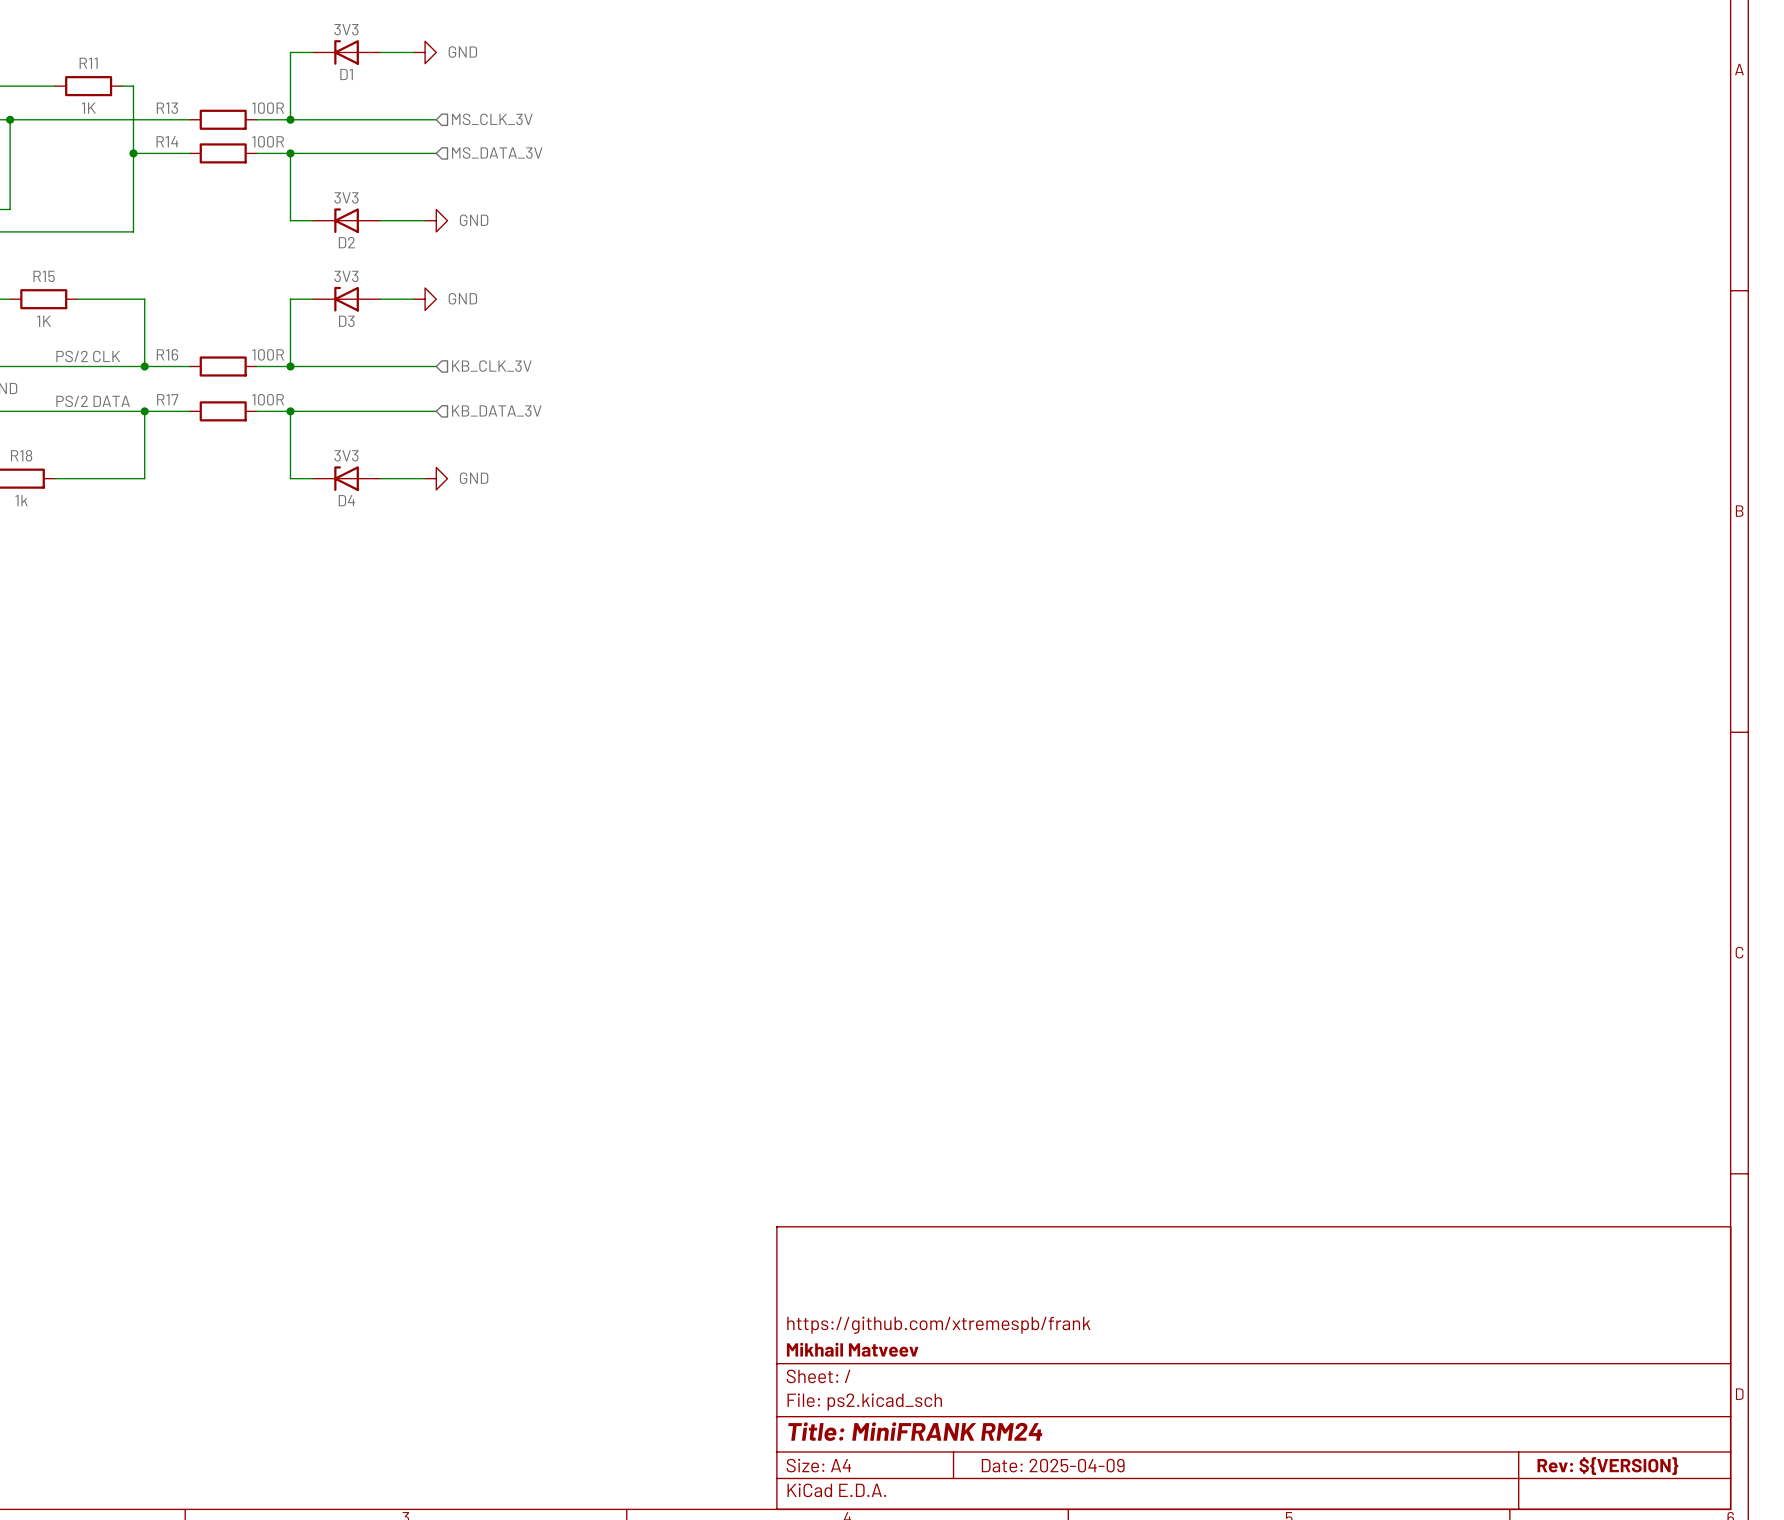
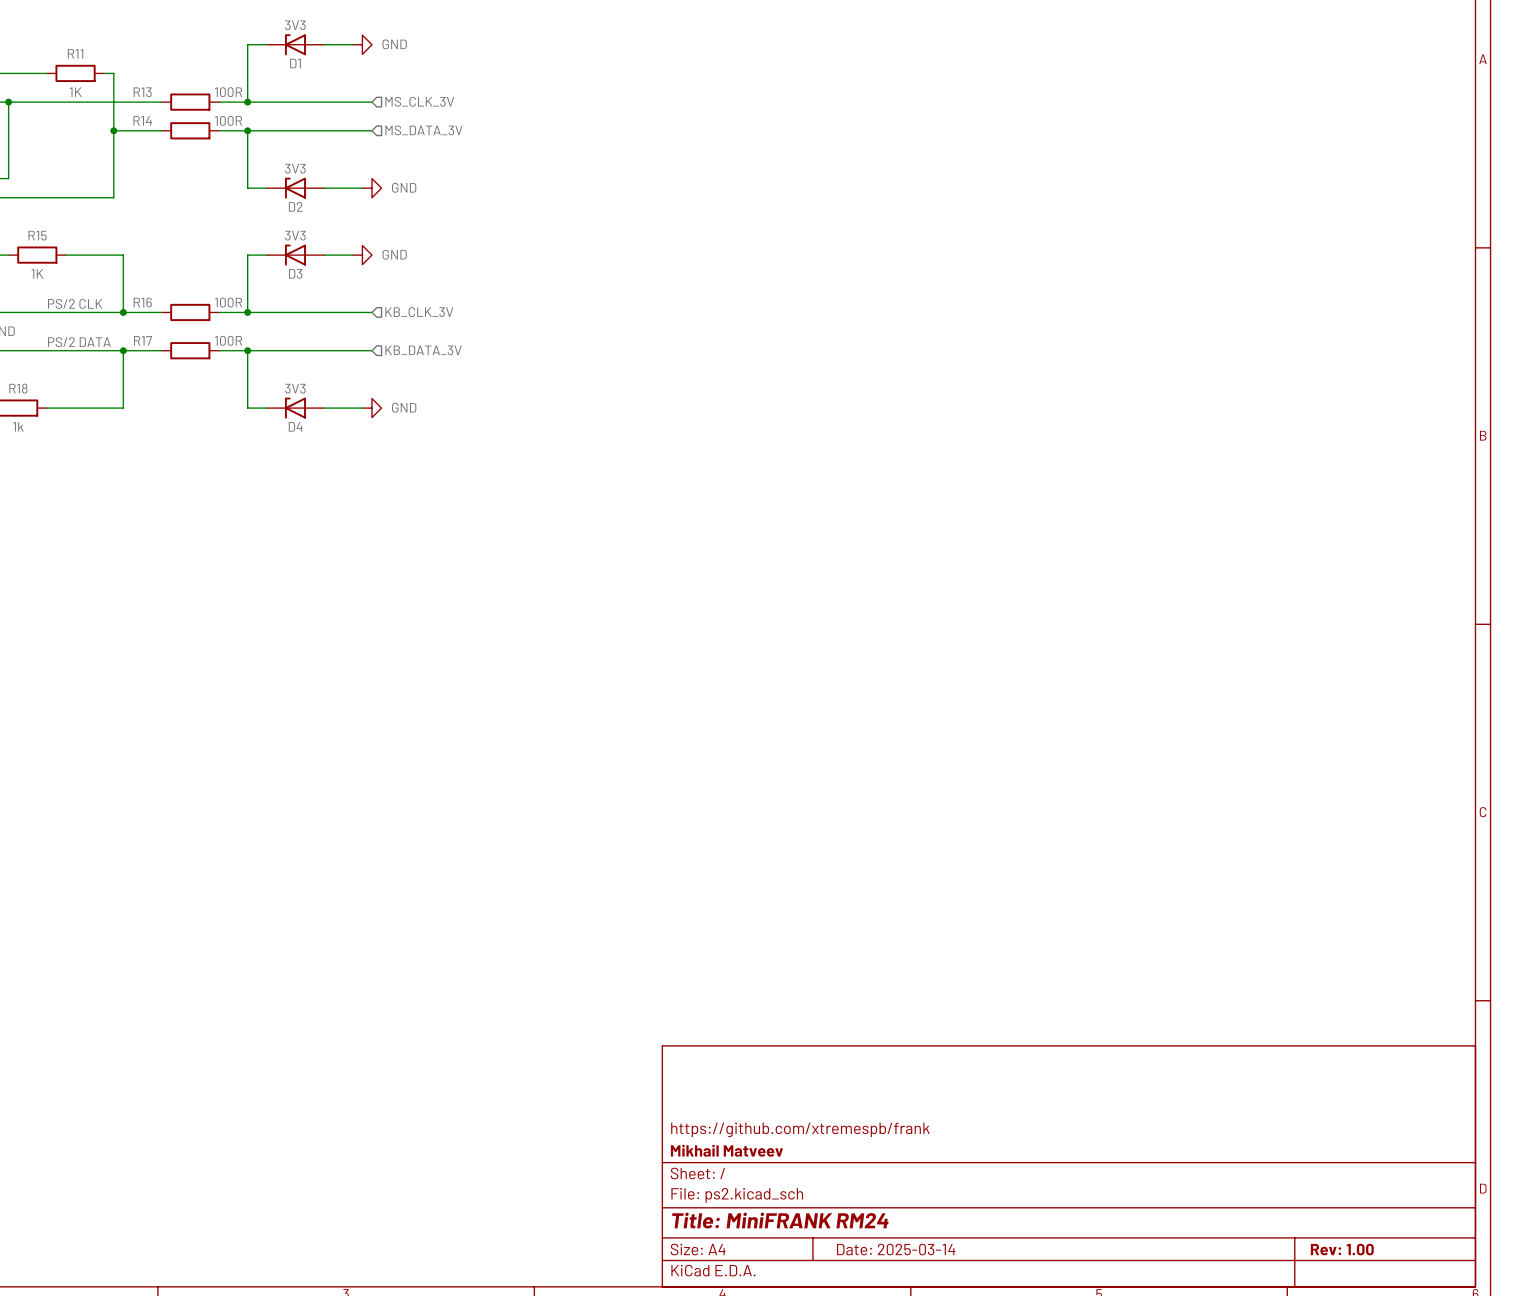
title block: Date: 2025-04-09 (1053, 1465) -> Date: 2025-03-14 (896, 1249)
title block: Rev: ${VERSION} (1607, 1466) -> Rev: 1.00 (1342, 1249)

